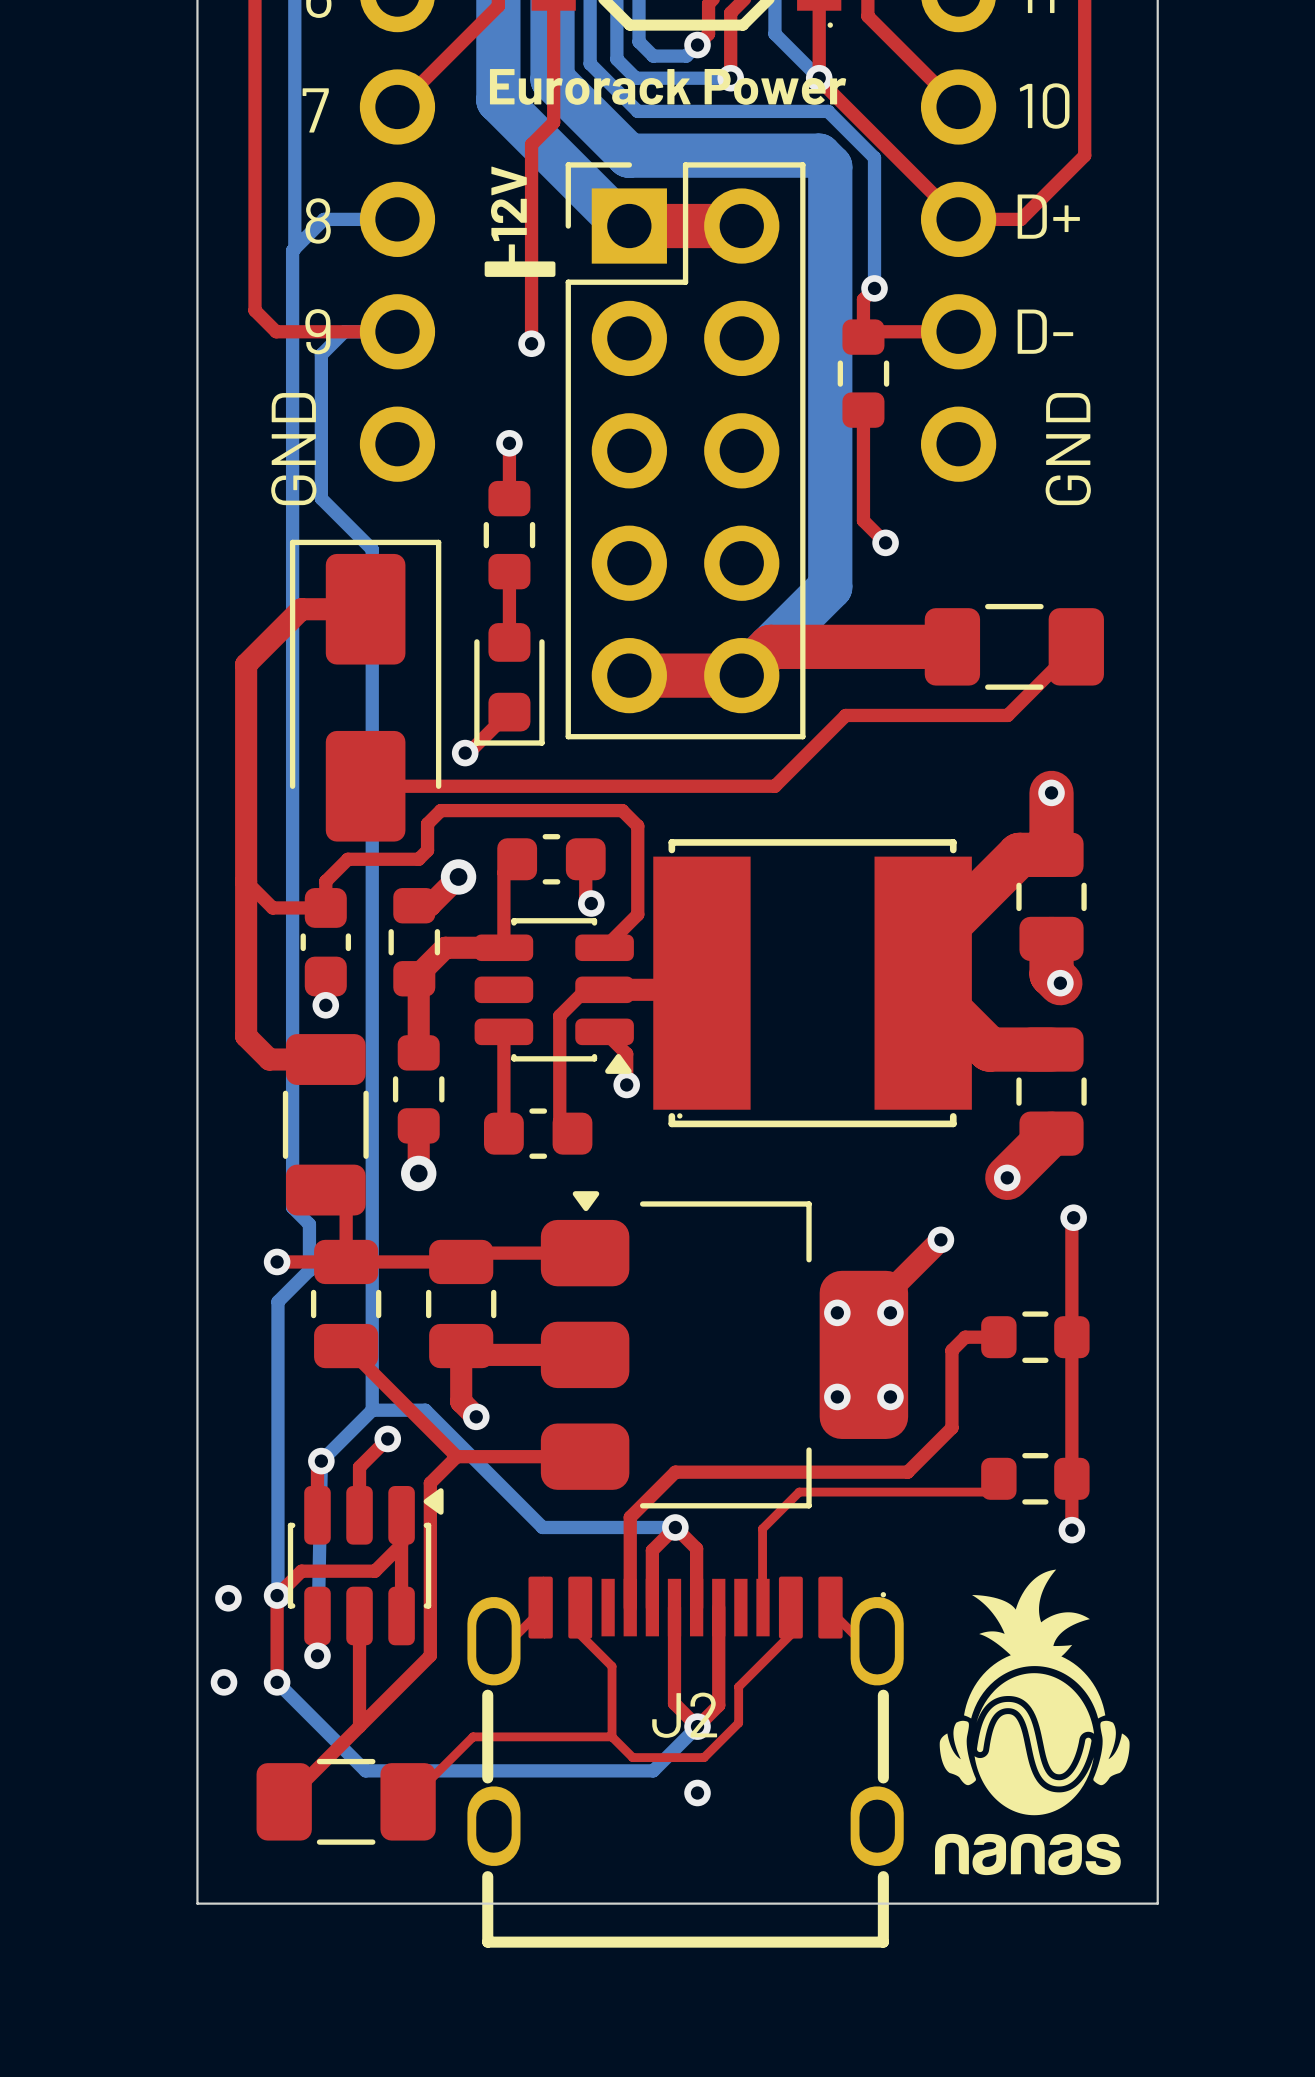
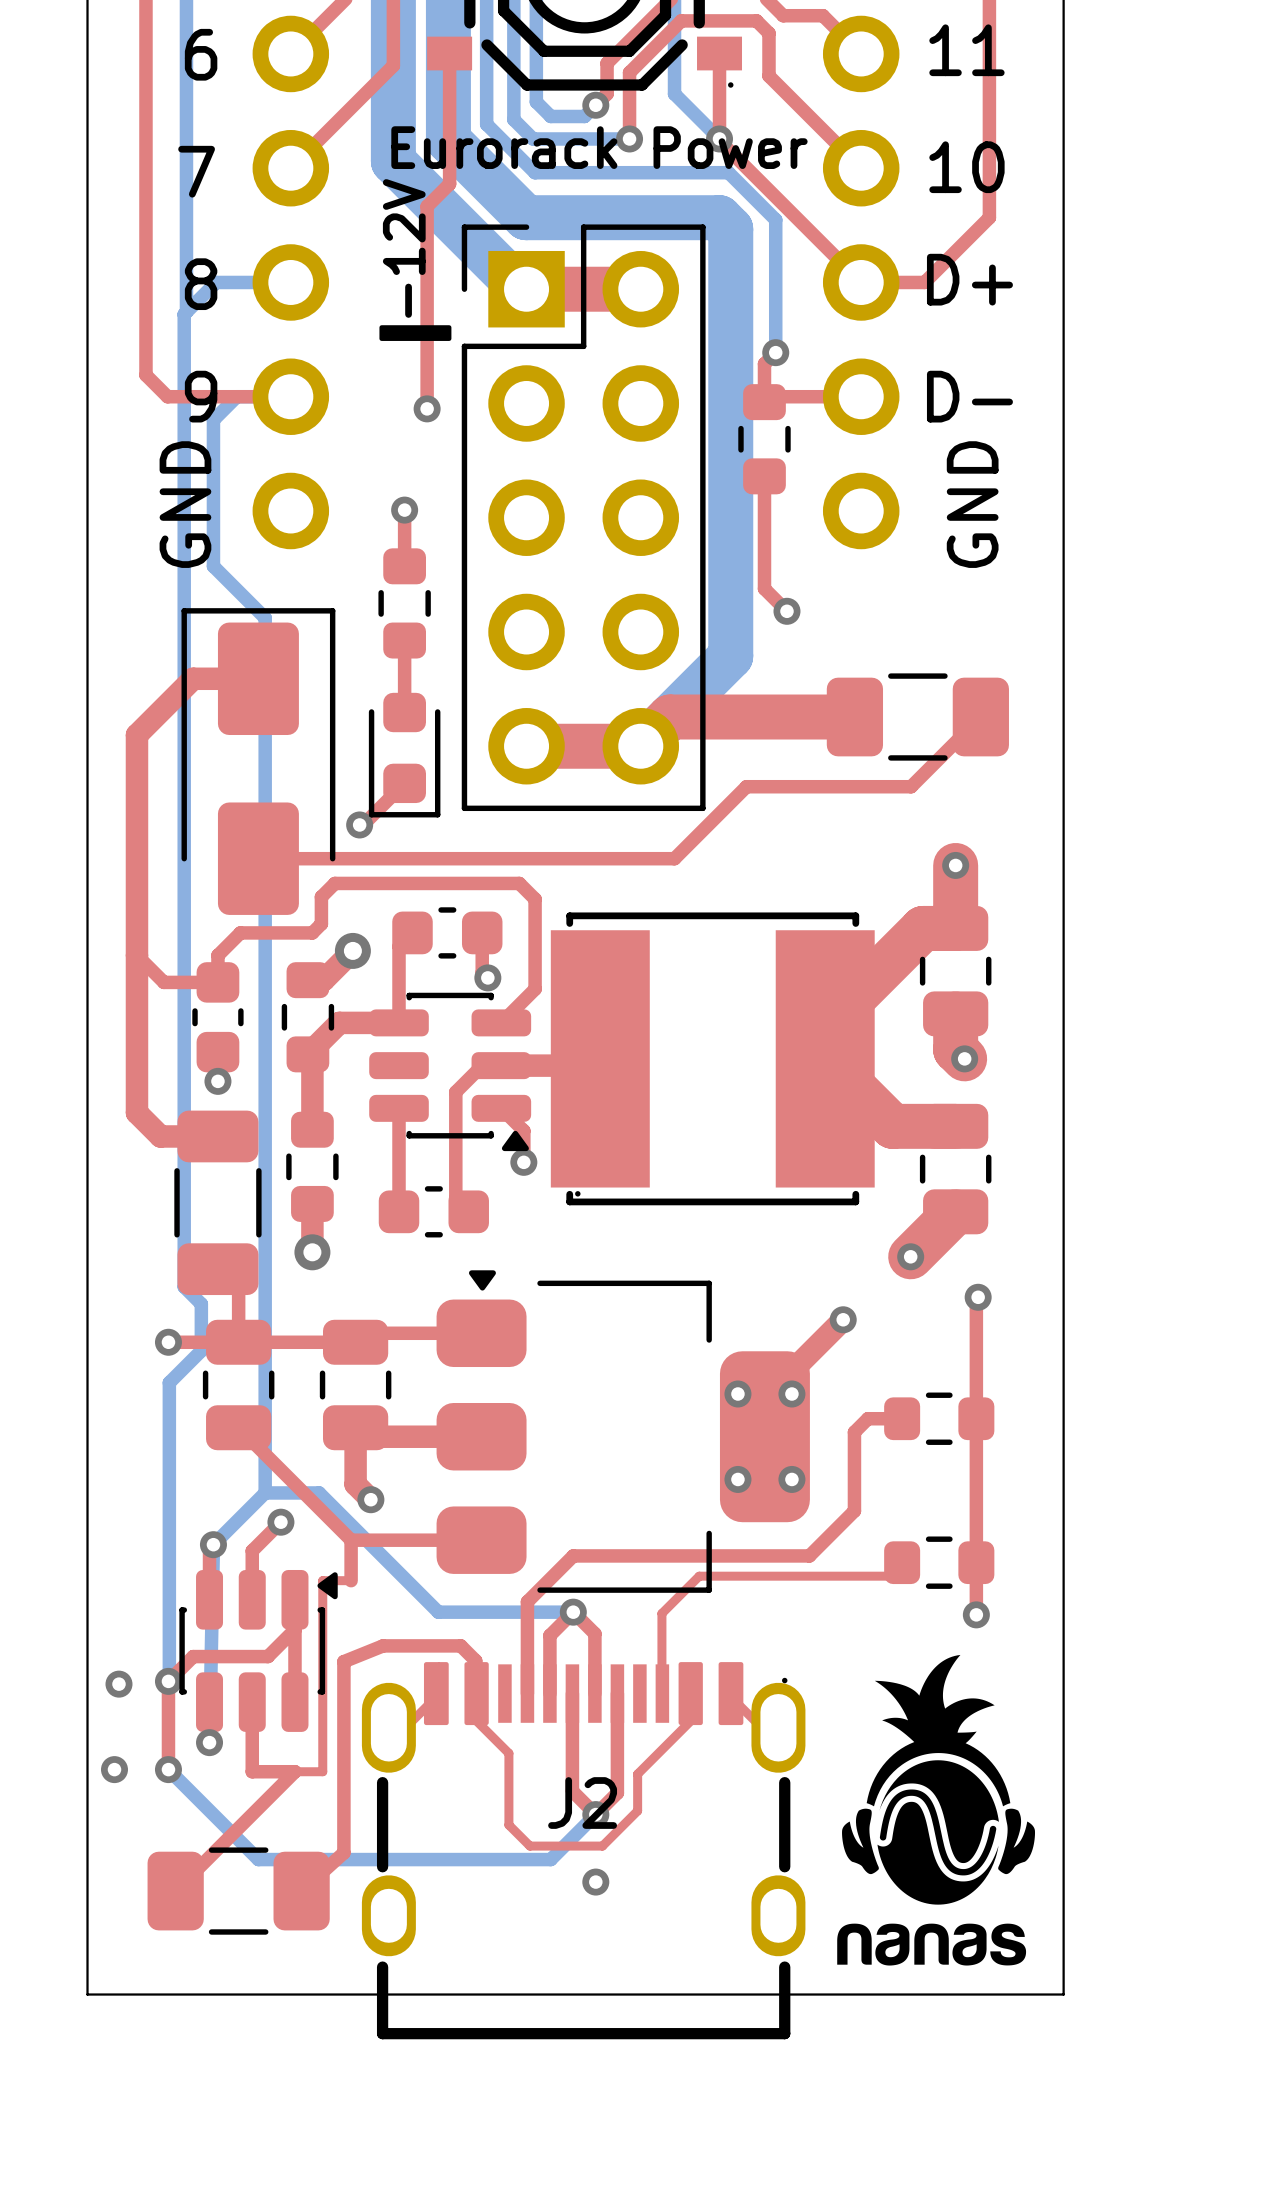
top track: (456, 1456) (430, 1483) (430, 1655) (401, 1684) -> (351, 1540) (351, 1580) (322, 1580) (322, 1771) (252, 1771)
top track: (359, 1684) (359, 1726) -> none
top track: (612, 1736) (473, 1736) (408, 1801) -> (475, 1693) (475, 1660) (460, 1645) (383, 1645) (343, 1661) (343, 1852) (301, 1891)

